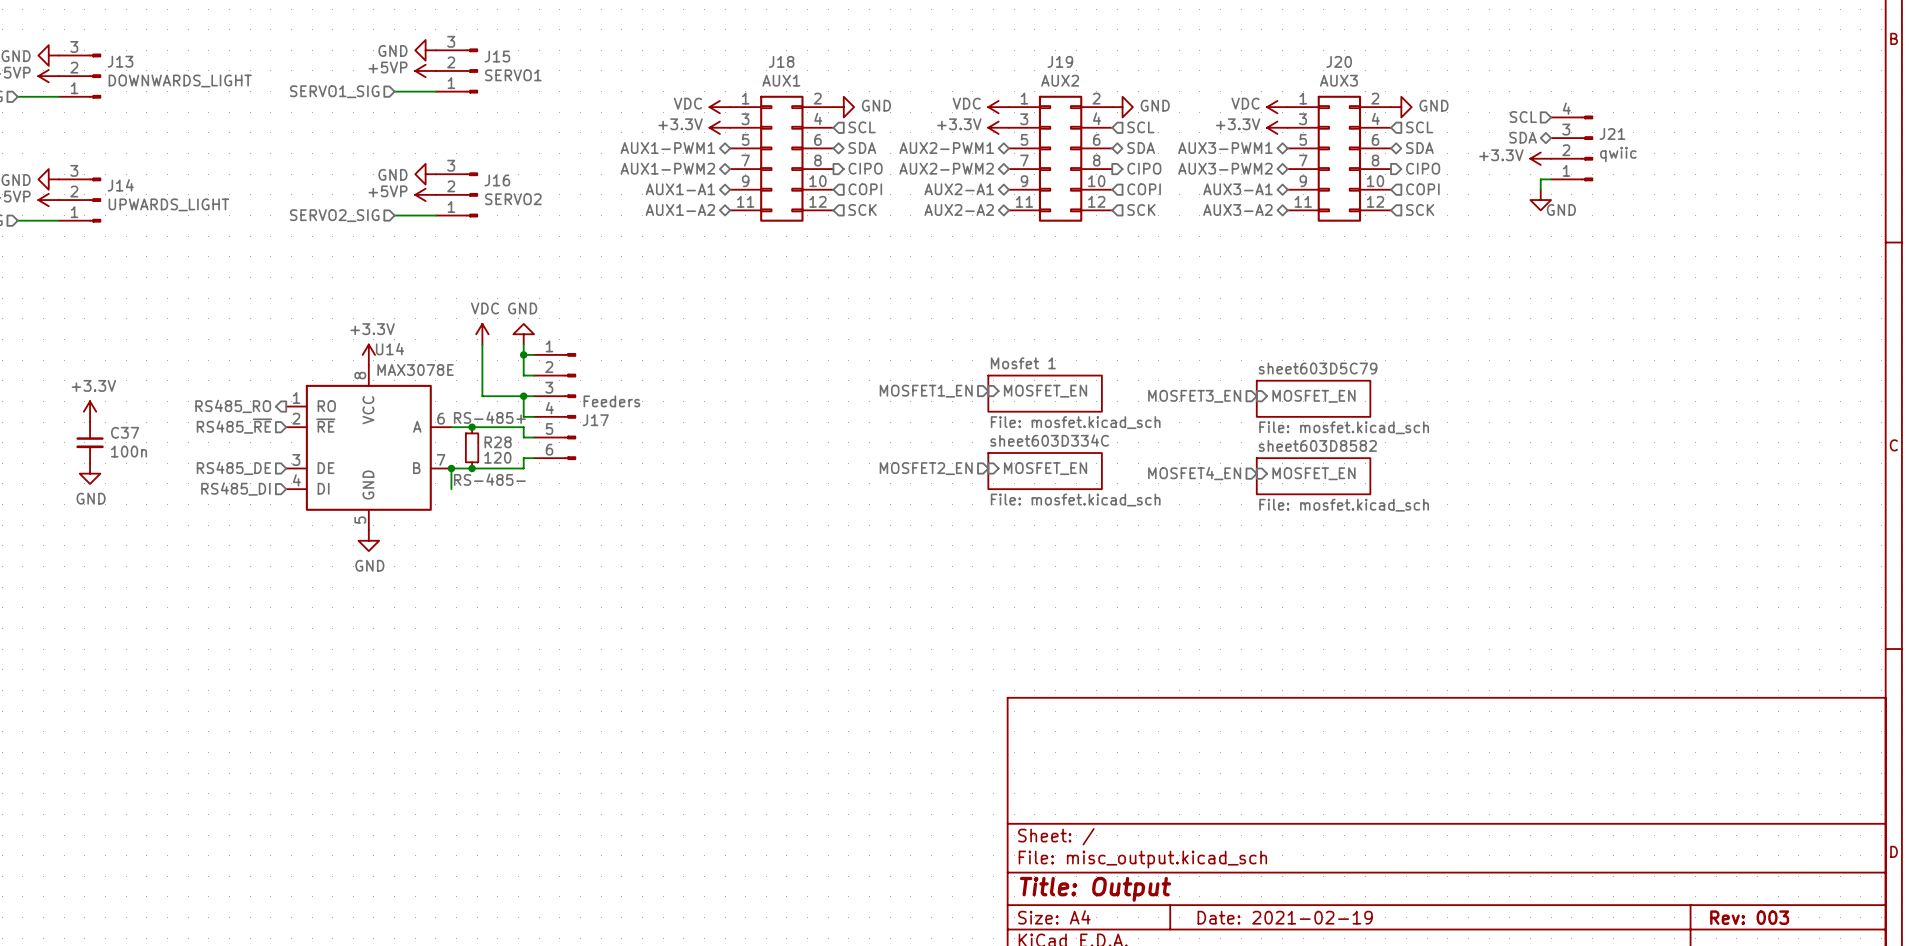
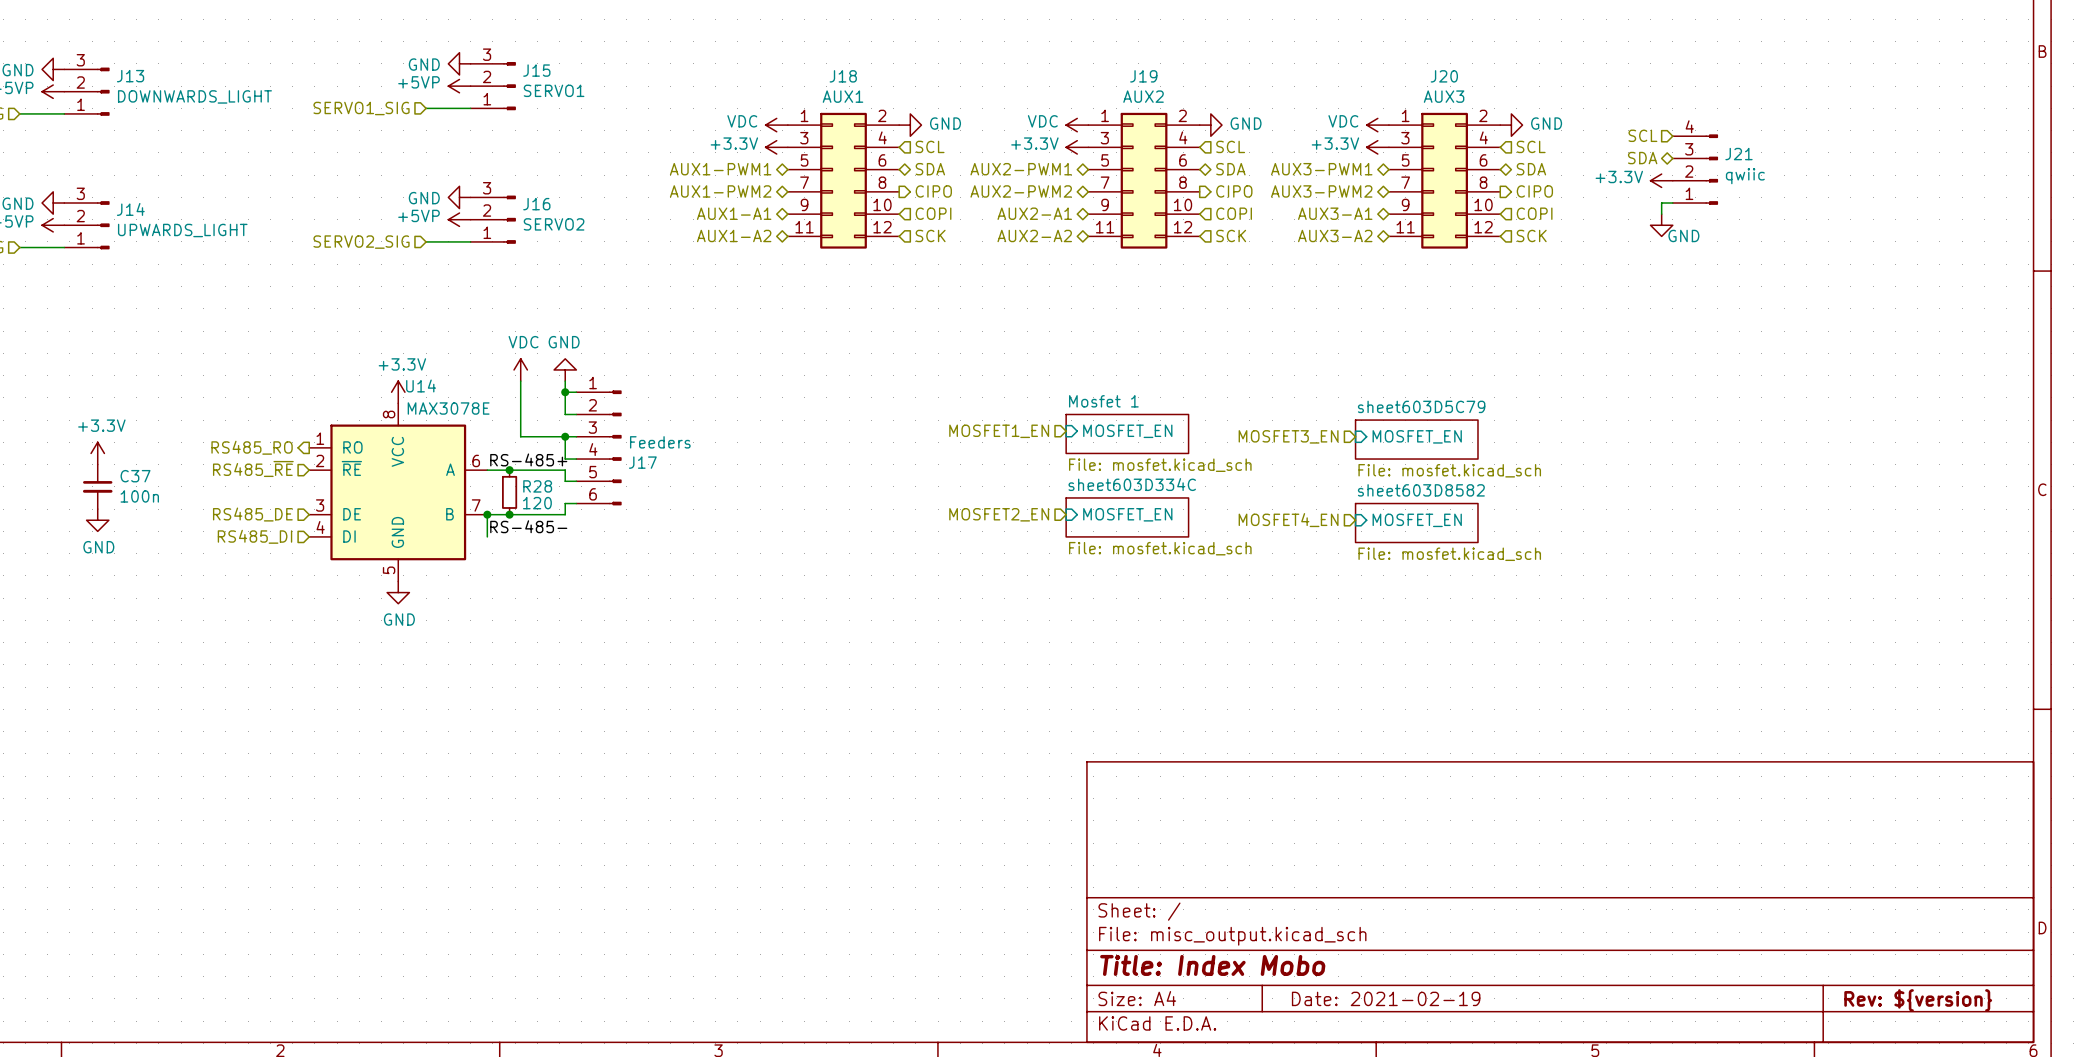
title block: Title: Output (1095, 889) -> Title: Index Mobo (1212, 965)
title block: Rev: 003 (1749, 917) -> Rev: ${version} (1918, 1000)

